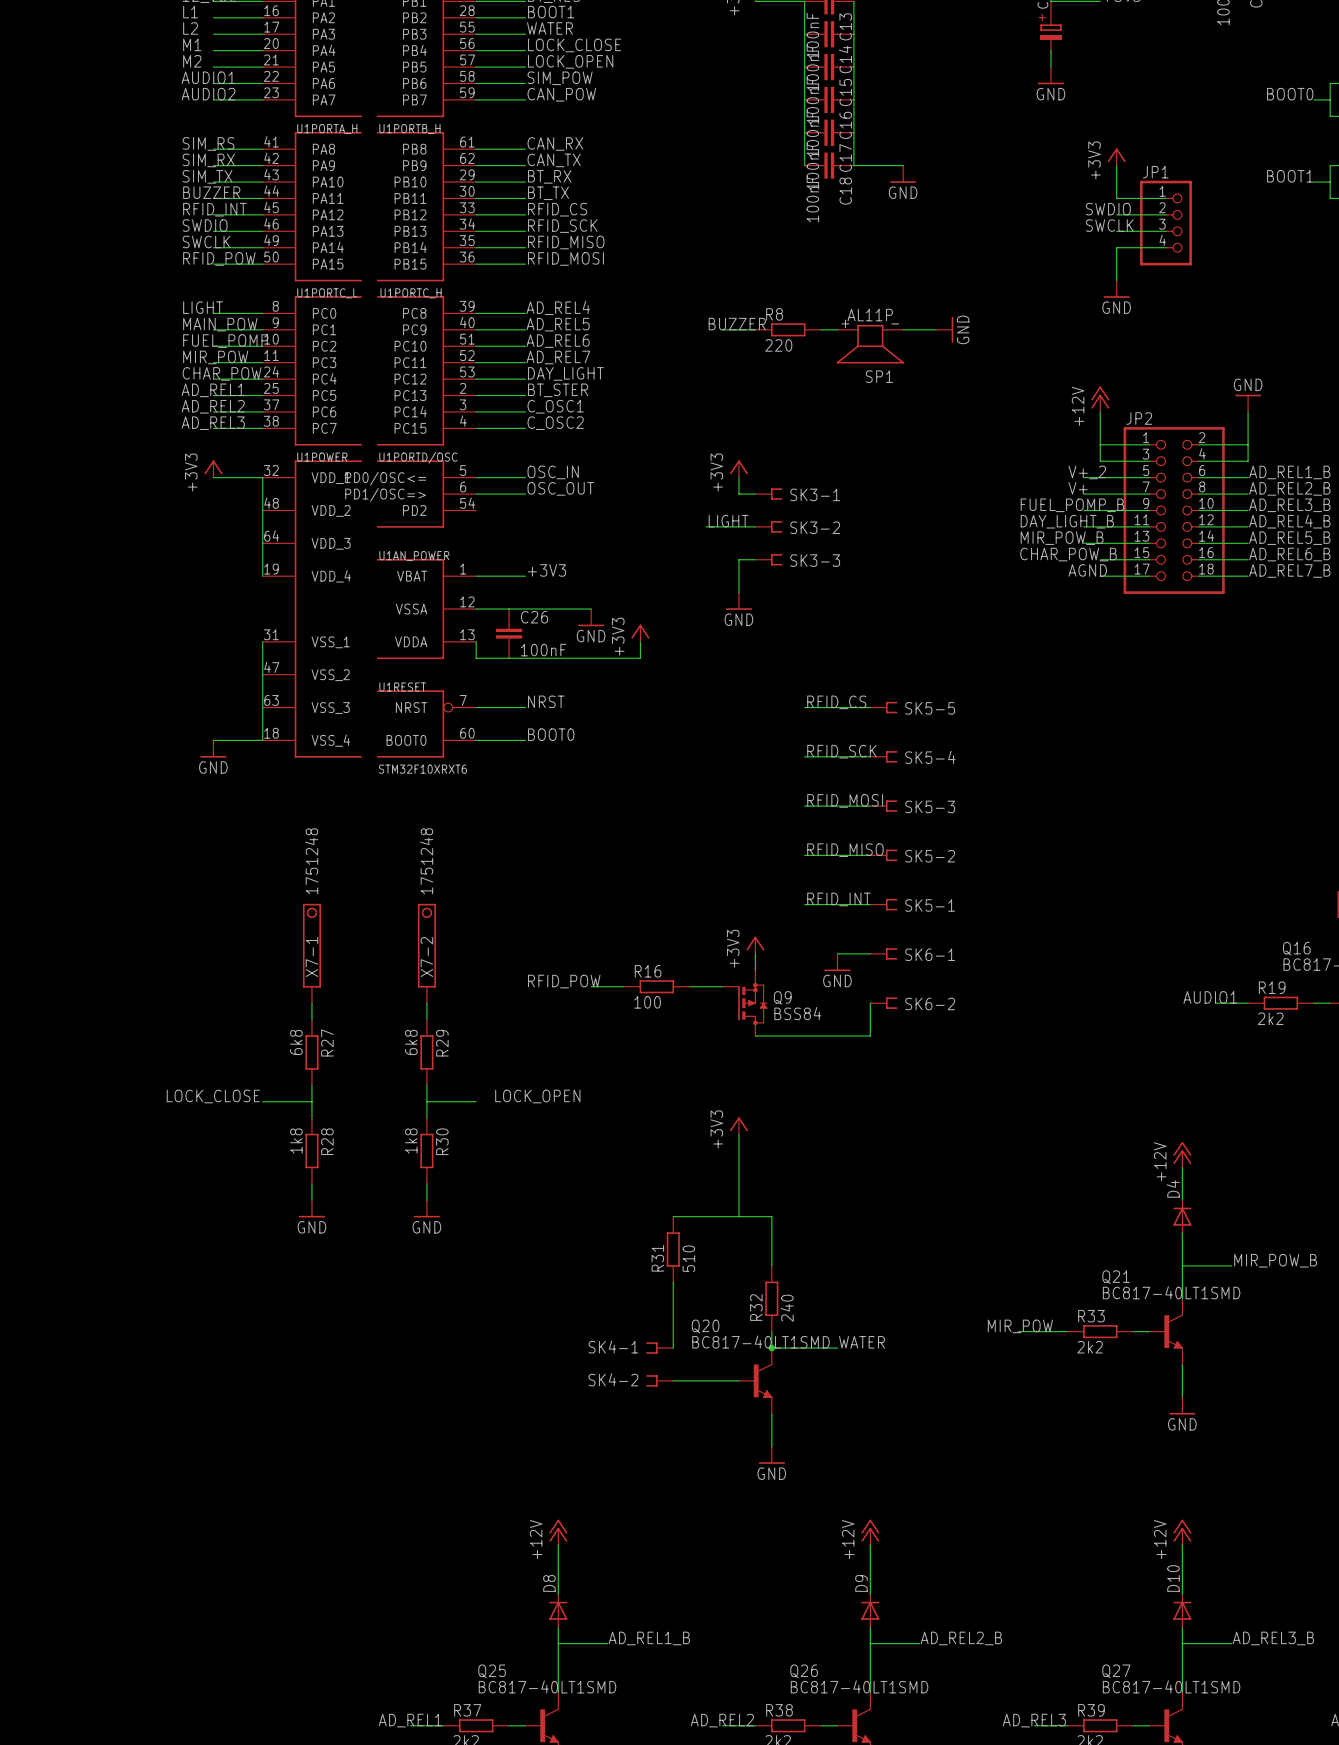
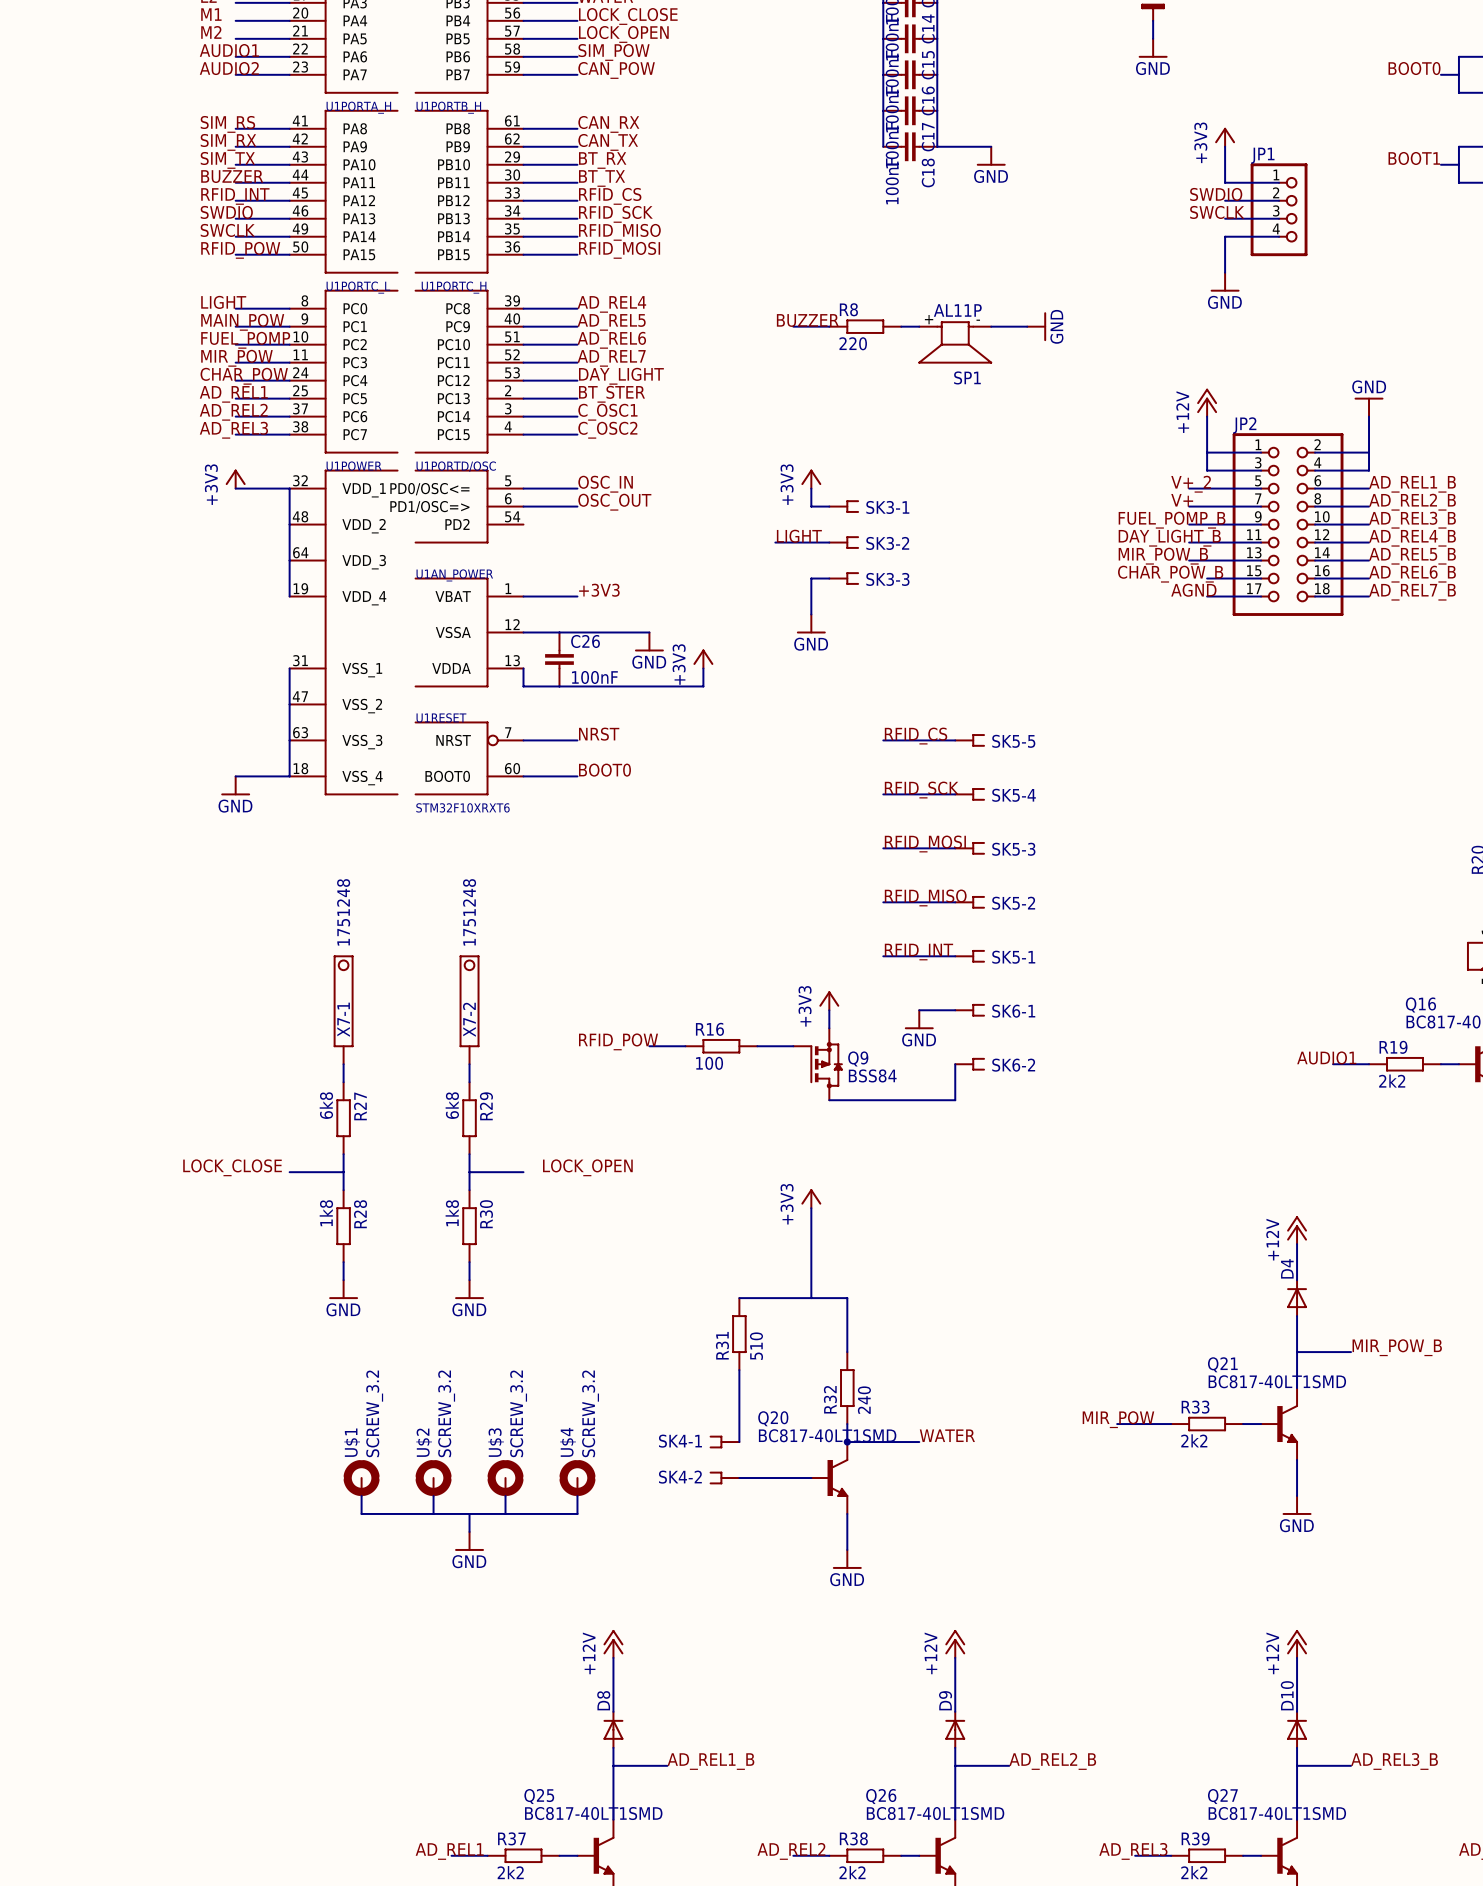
U$1: none -> SCREW_3.2 (361, 1478)
U$2: none -> SCREW_3.2 (433, 1478)
U$3: none -> SCREW_3.2 (505, 1478)
U$4: none -> SCREW_3.2 (577, 1478)
wire: none -> (361, 1495) (361, 1513) (577, 1513) (577, 1495)
wire: none -> (433, 1495) (433, 1513)
wire: none -> (505, 1495) (505, 1513)
wire: none -> (469, 1513) (469, 1531)
power symbol: none -> GND (469, 1541)

